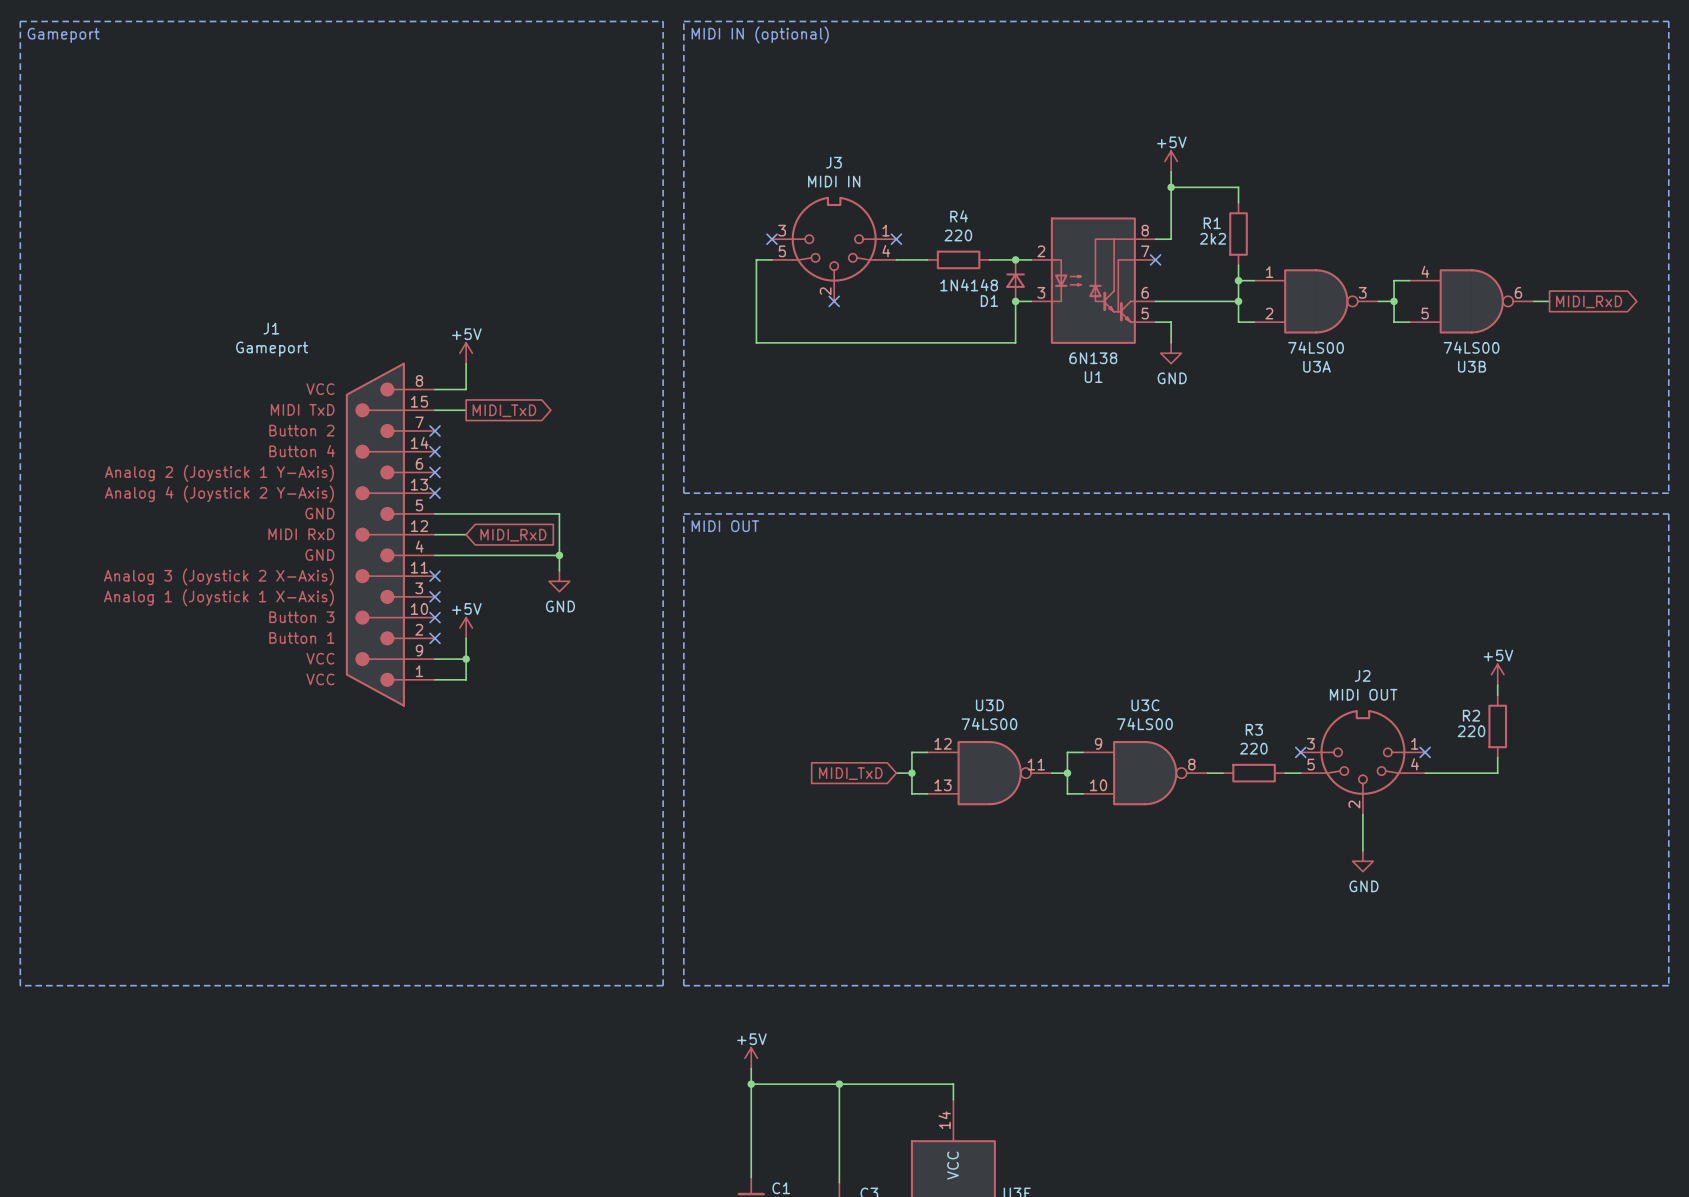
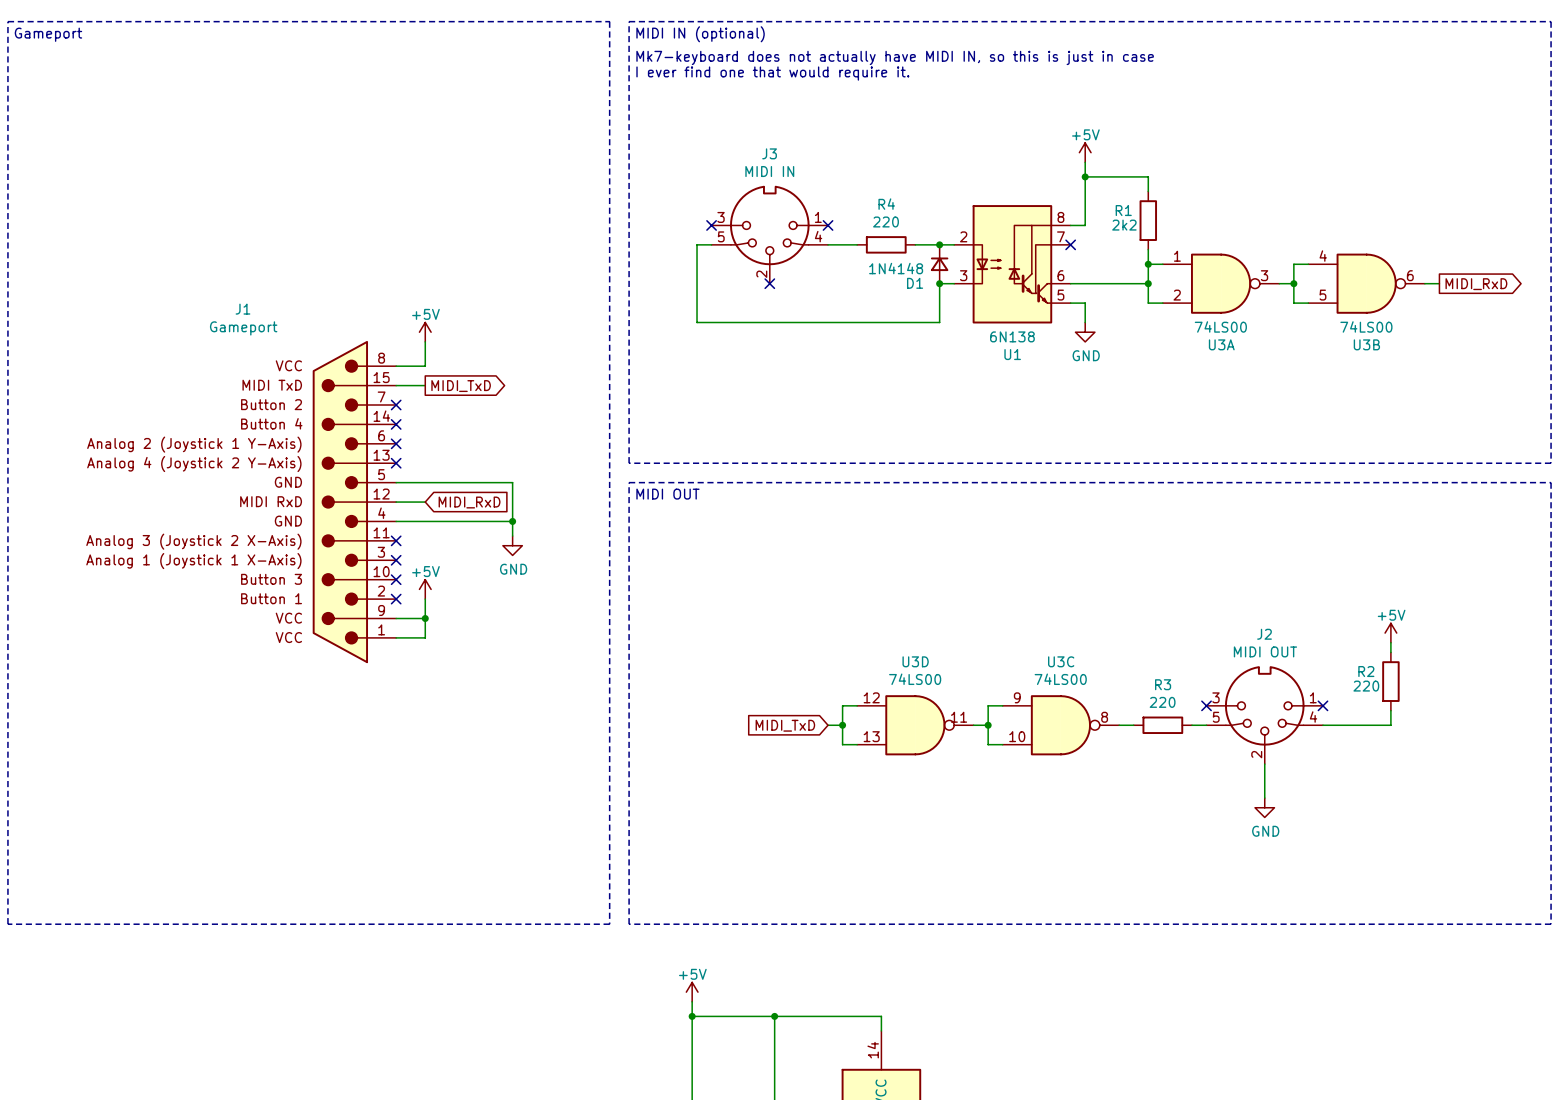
text: none -> Mk7-keyboard does not actually have MIDI IN, so this is just in case (895, 57)
text: none -> I ever find one that would require it. (772, 73)

